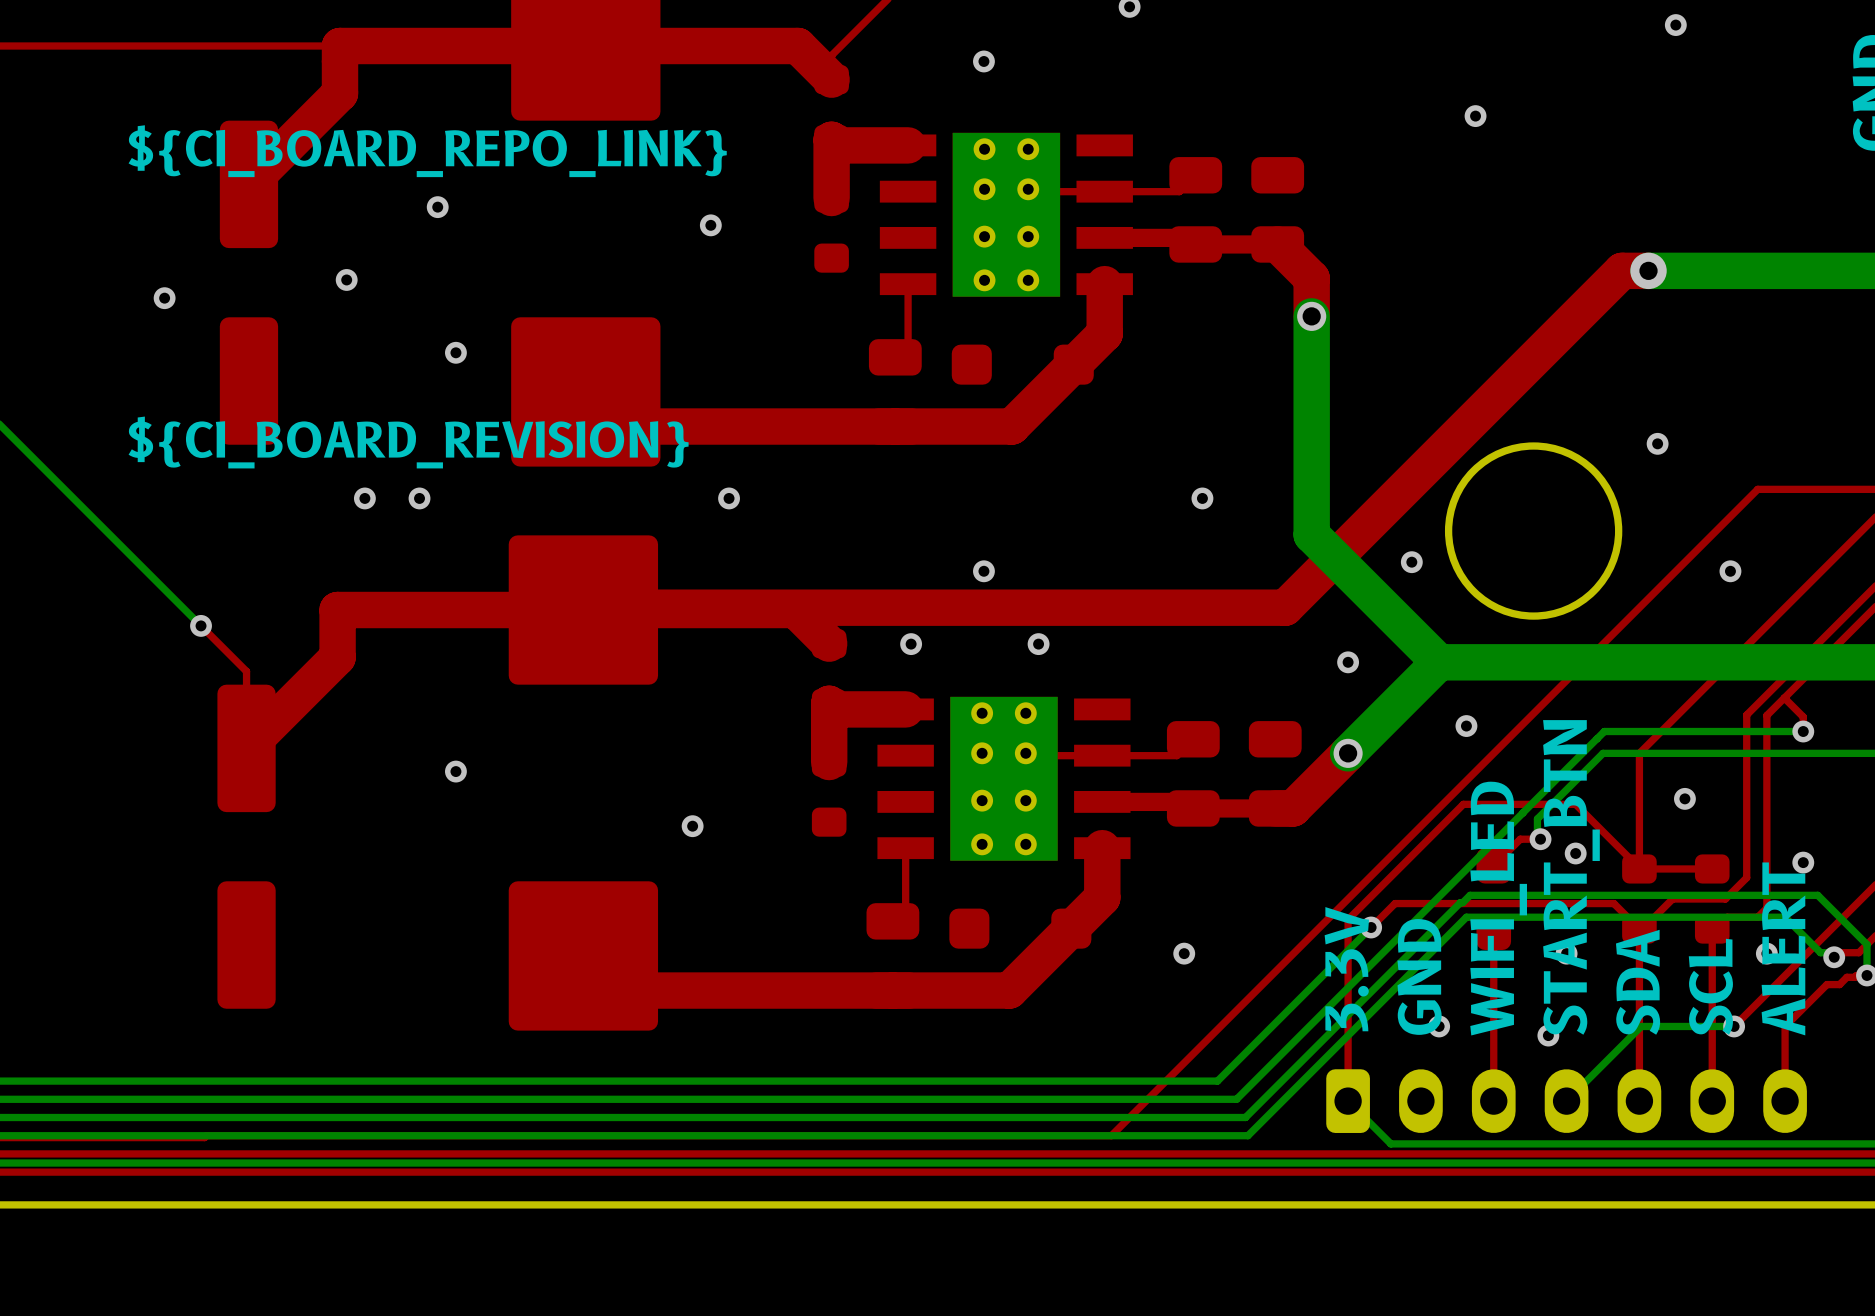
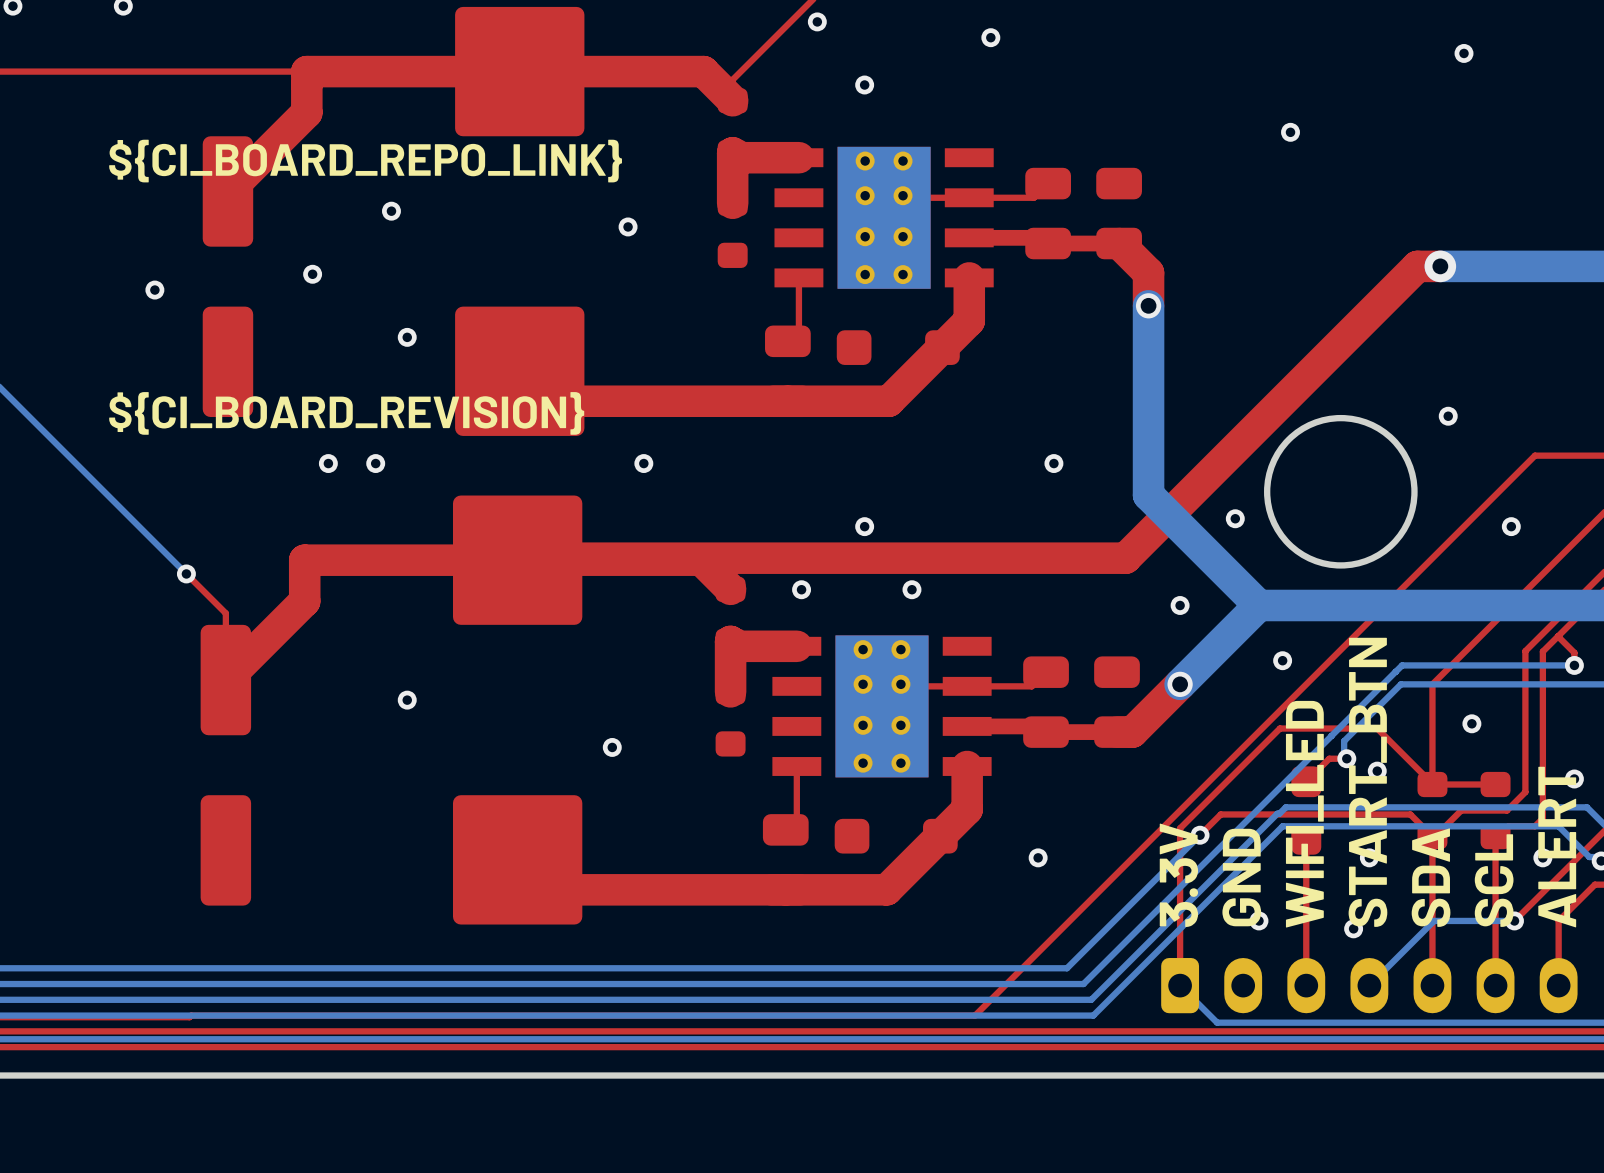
text position: ${CI_BOARD_REPO_LINK} (427, 151) -> ${CI_BOARD_REPO_LINK} (365, 161)
text position: ${CI_BOARD_REVISION} (408, 442) -> ${CI_BOARD_REVISION} (346, 413)

